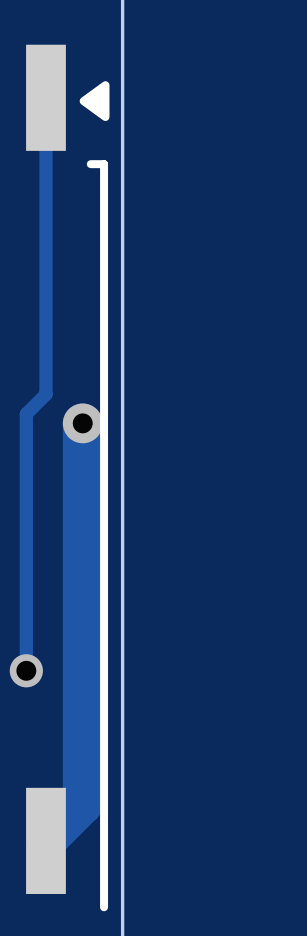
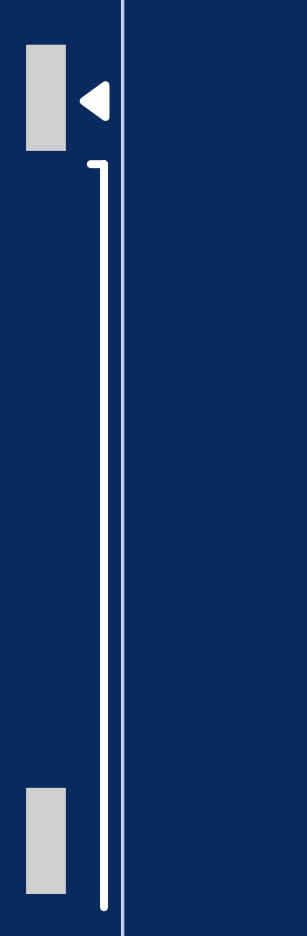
track: (45, 97) (45, 394) (26, 414) (26, 670) -> none
track: (82, 423) (82, 804) (45, 840) -> none
via: (82, 423) -> none
via: (26, 670) -> none

